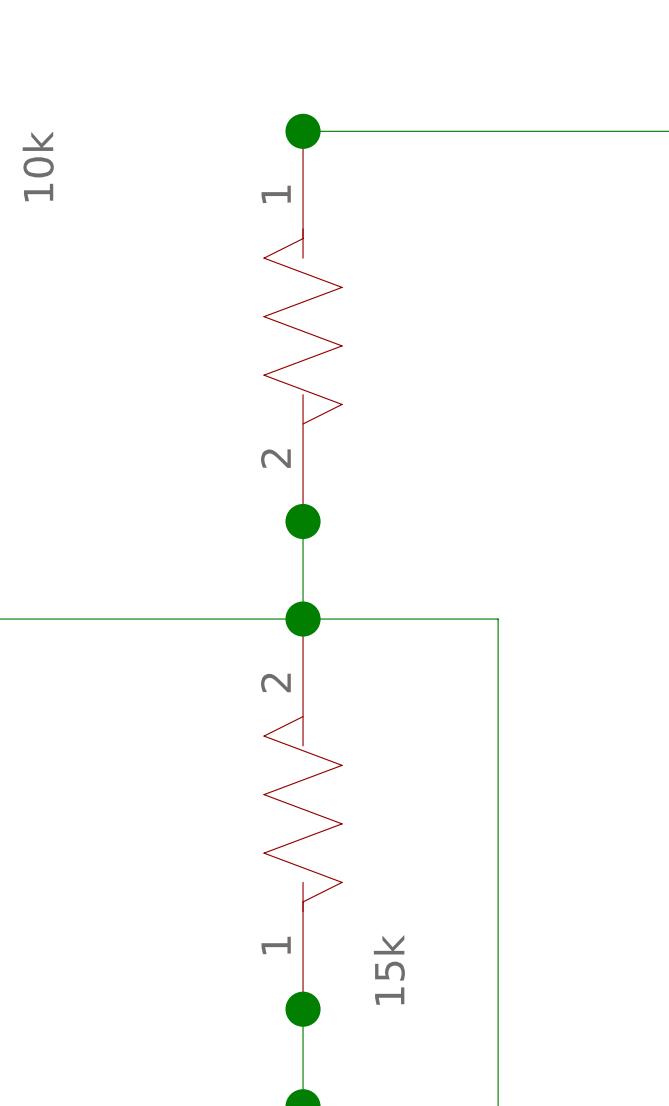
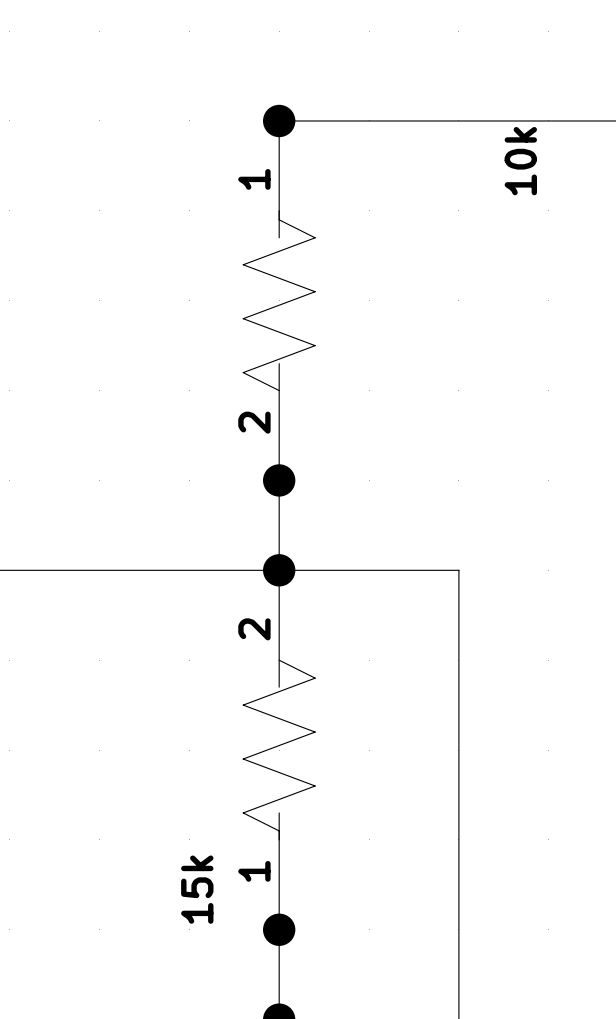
part flip: as is (303, 326) -> left-right (279, 300)
part flip: as is (303, 814) -> left-right (279, 750)

